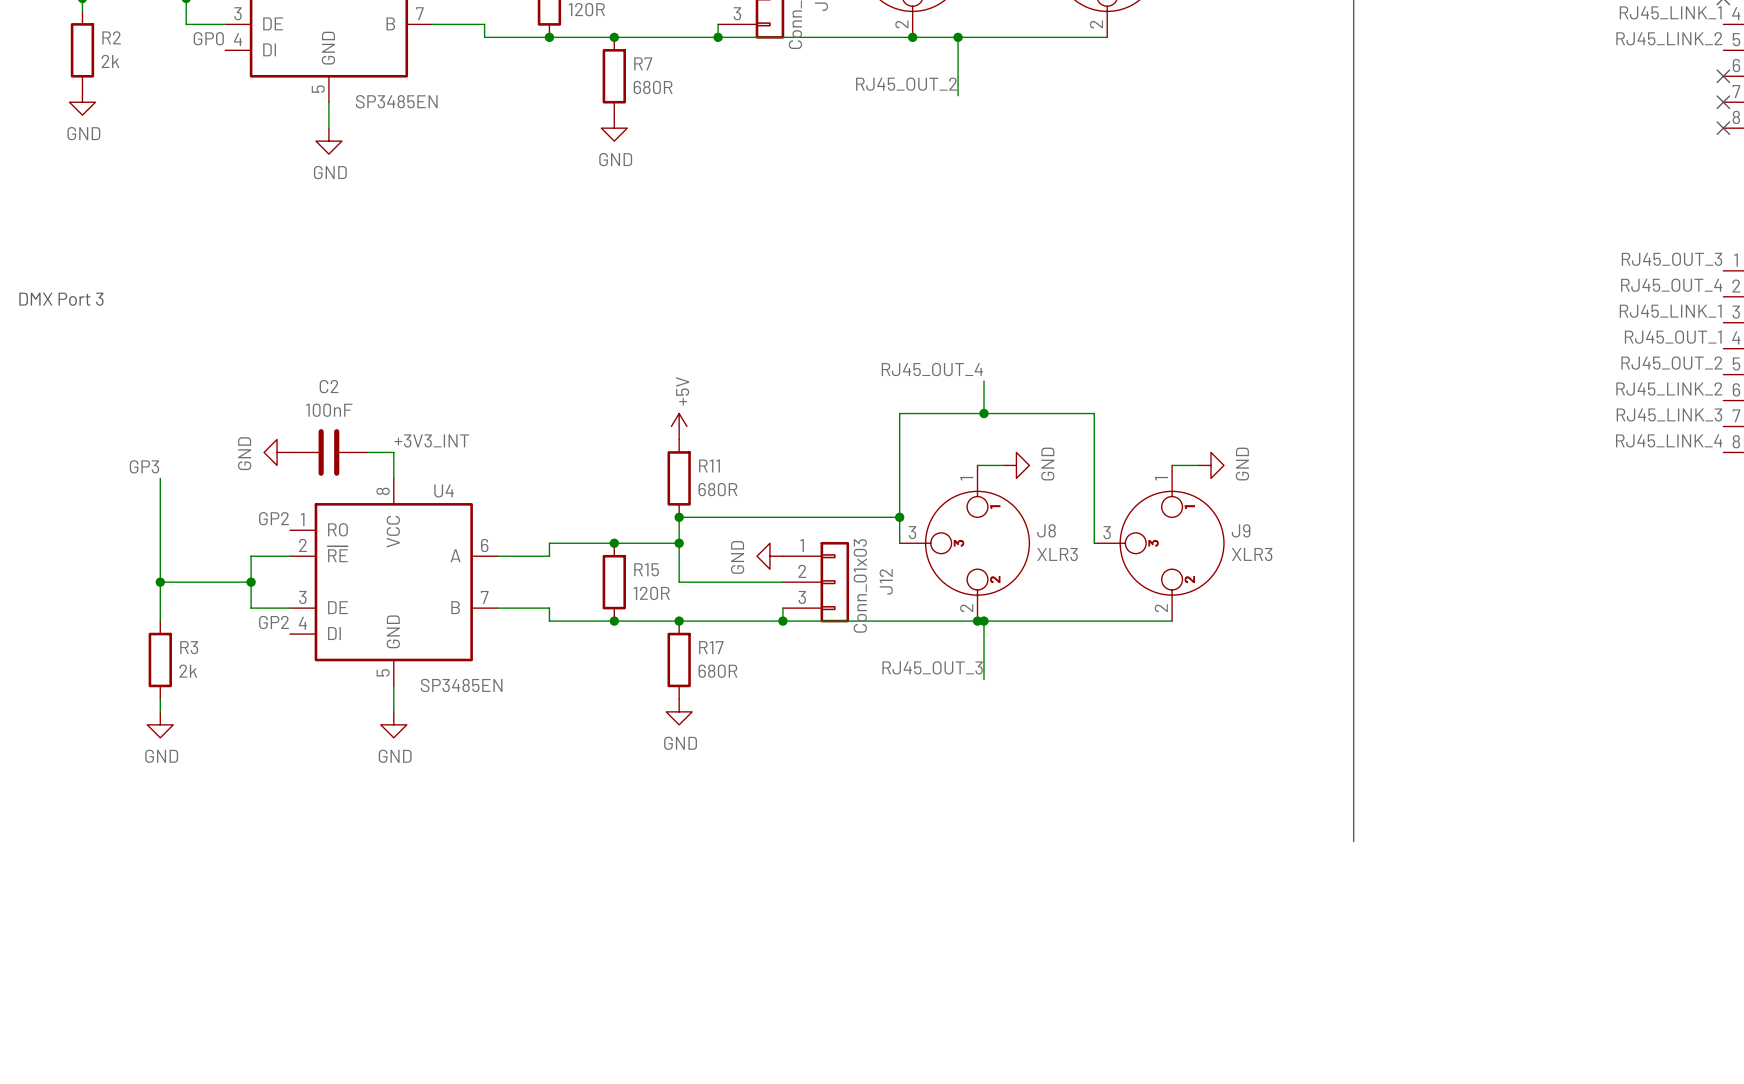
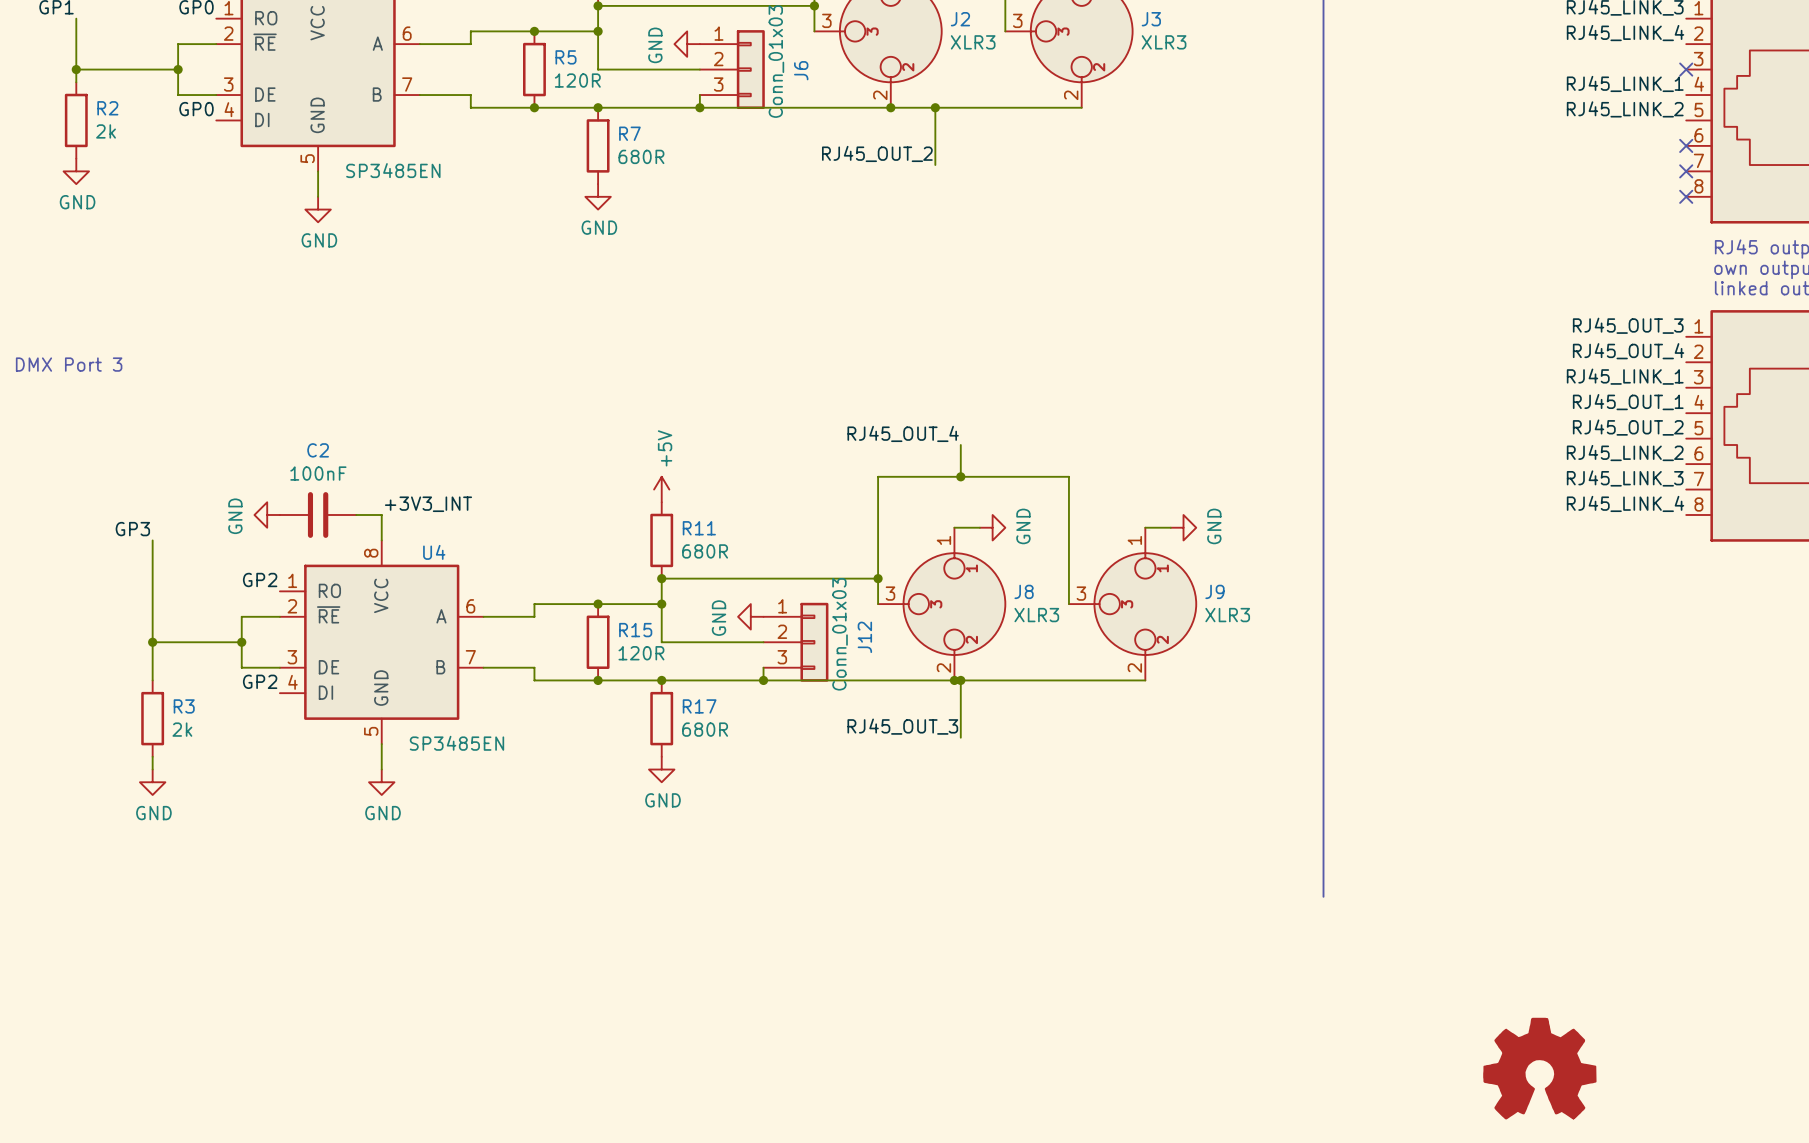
part: none -> (1539, 1068)

